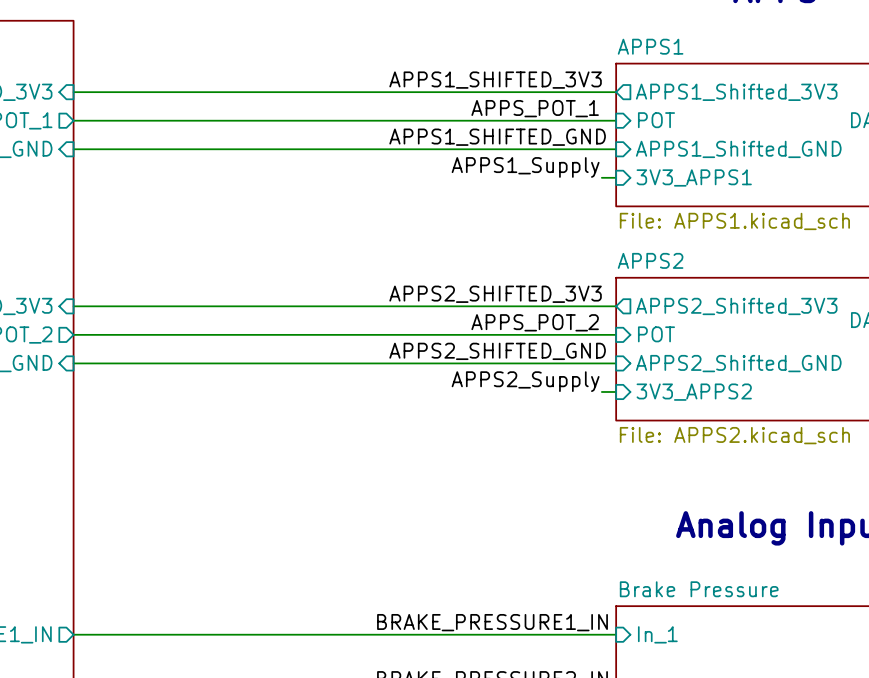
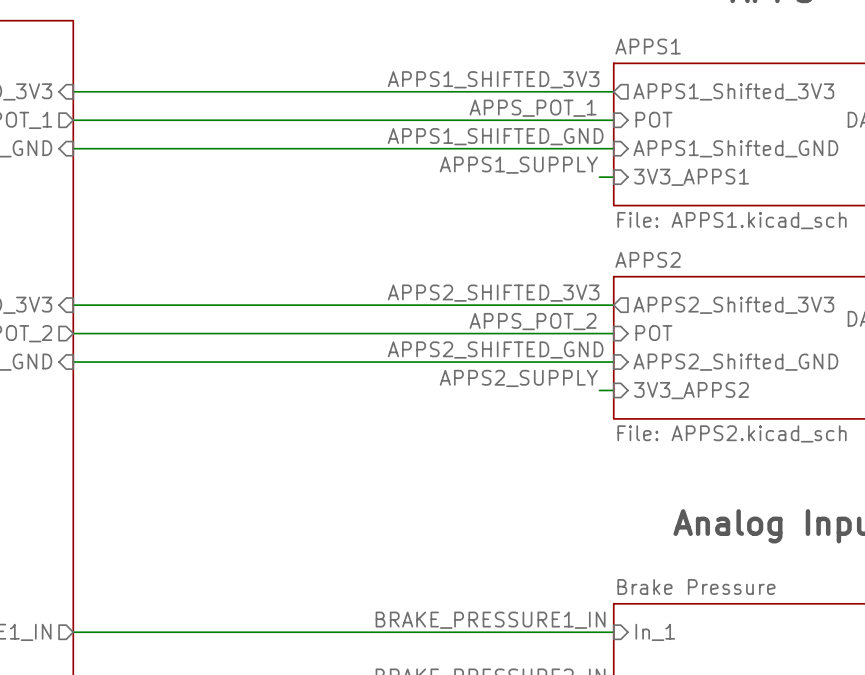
label: APPS1_Supply (525, 167) -> APPS1_SUPPLY (518, 165)
label: APPS2_Supply (525, 381) -> APPS2_SUPPLY (518, 378)

